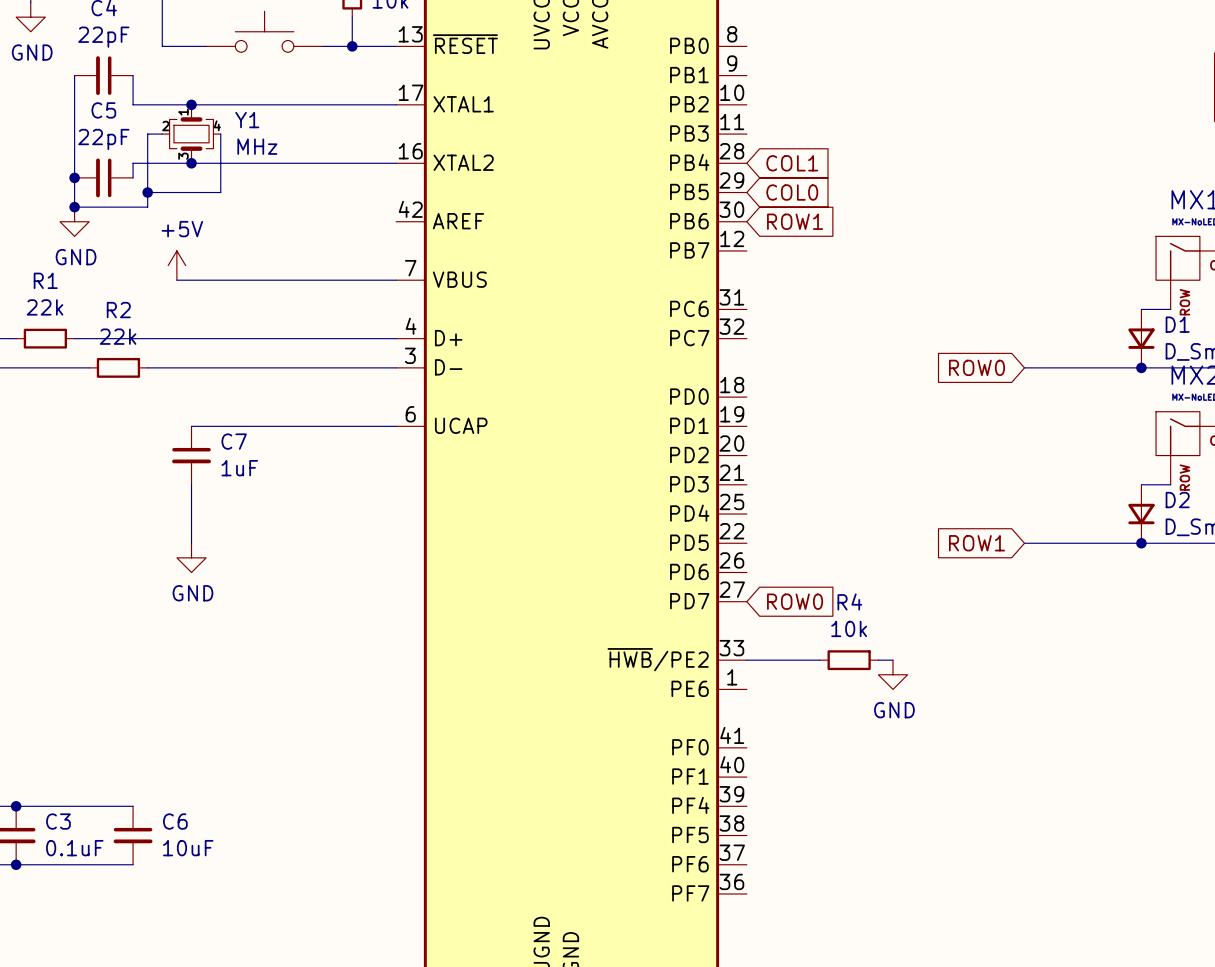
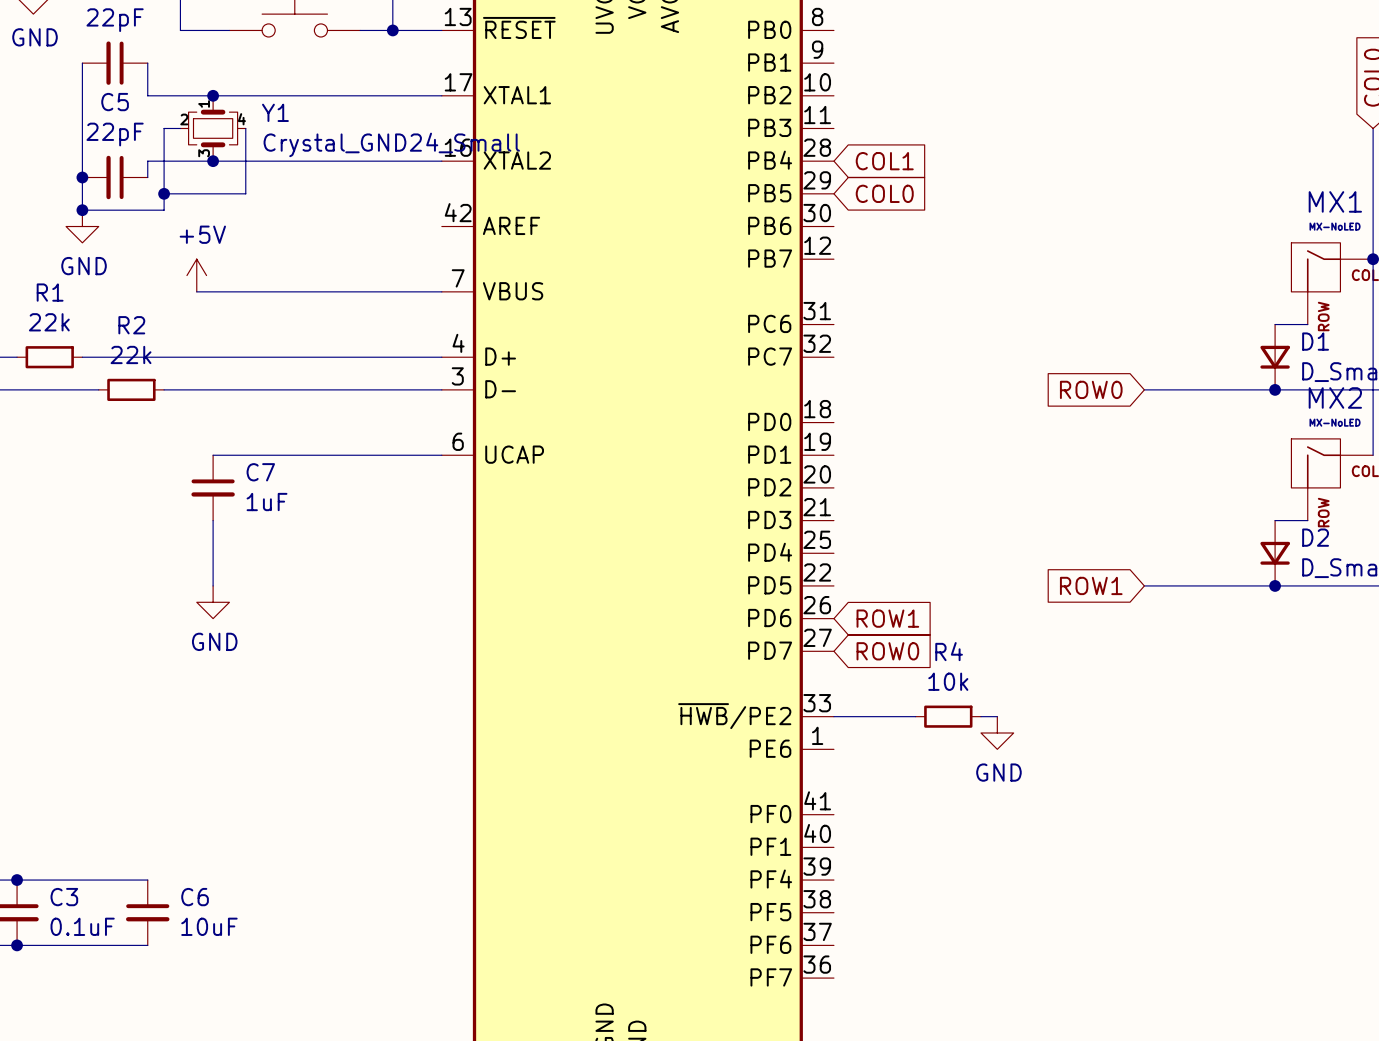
Y1 value: MHz (257, 146) -> Crystal_GND24_Small (391, 144)
global label: ROW1 (795, 221) -> none
global label: none -> ROW1 (887, 618)

